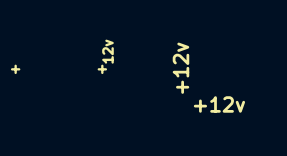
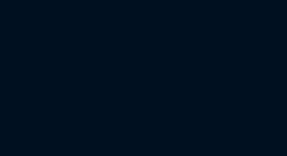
text: 12v (107, 51) -> none
text: +12v (180, 68) -> none
text: + (15, 69) -> none
text: + (102, 69) -> none
text: +12v (219, 104) -> none

